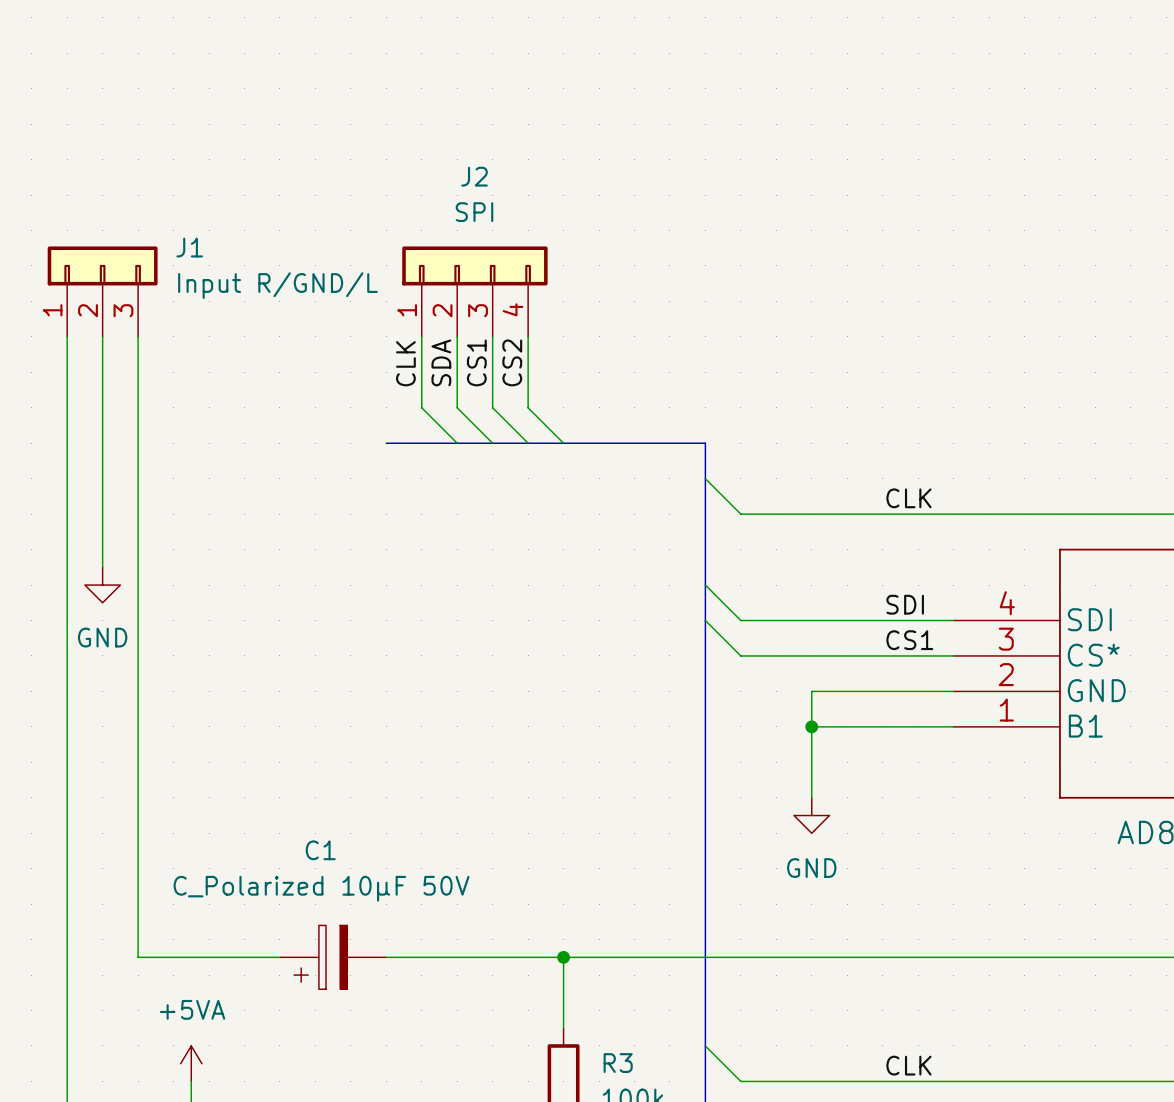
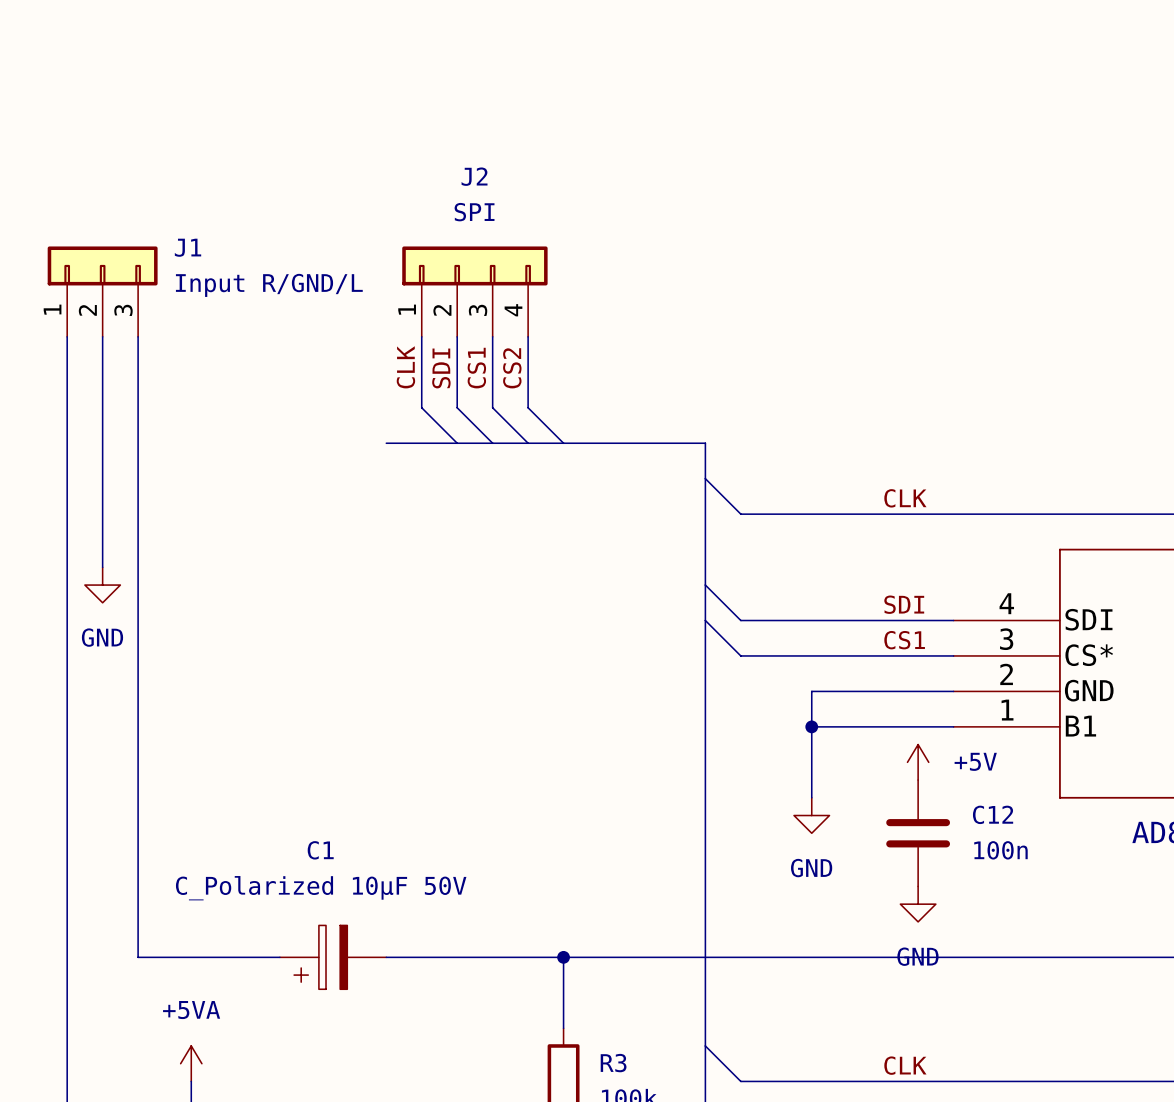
label: SDA (441, 362) -> SDI (441, 368)
power symbol: none -> +5V (918, 762)
C12: none -> 100n (918, 833)
power symbol: none -> GND (918, 904)

